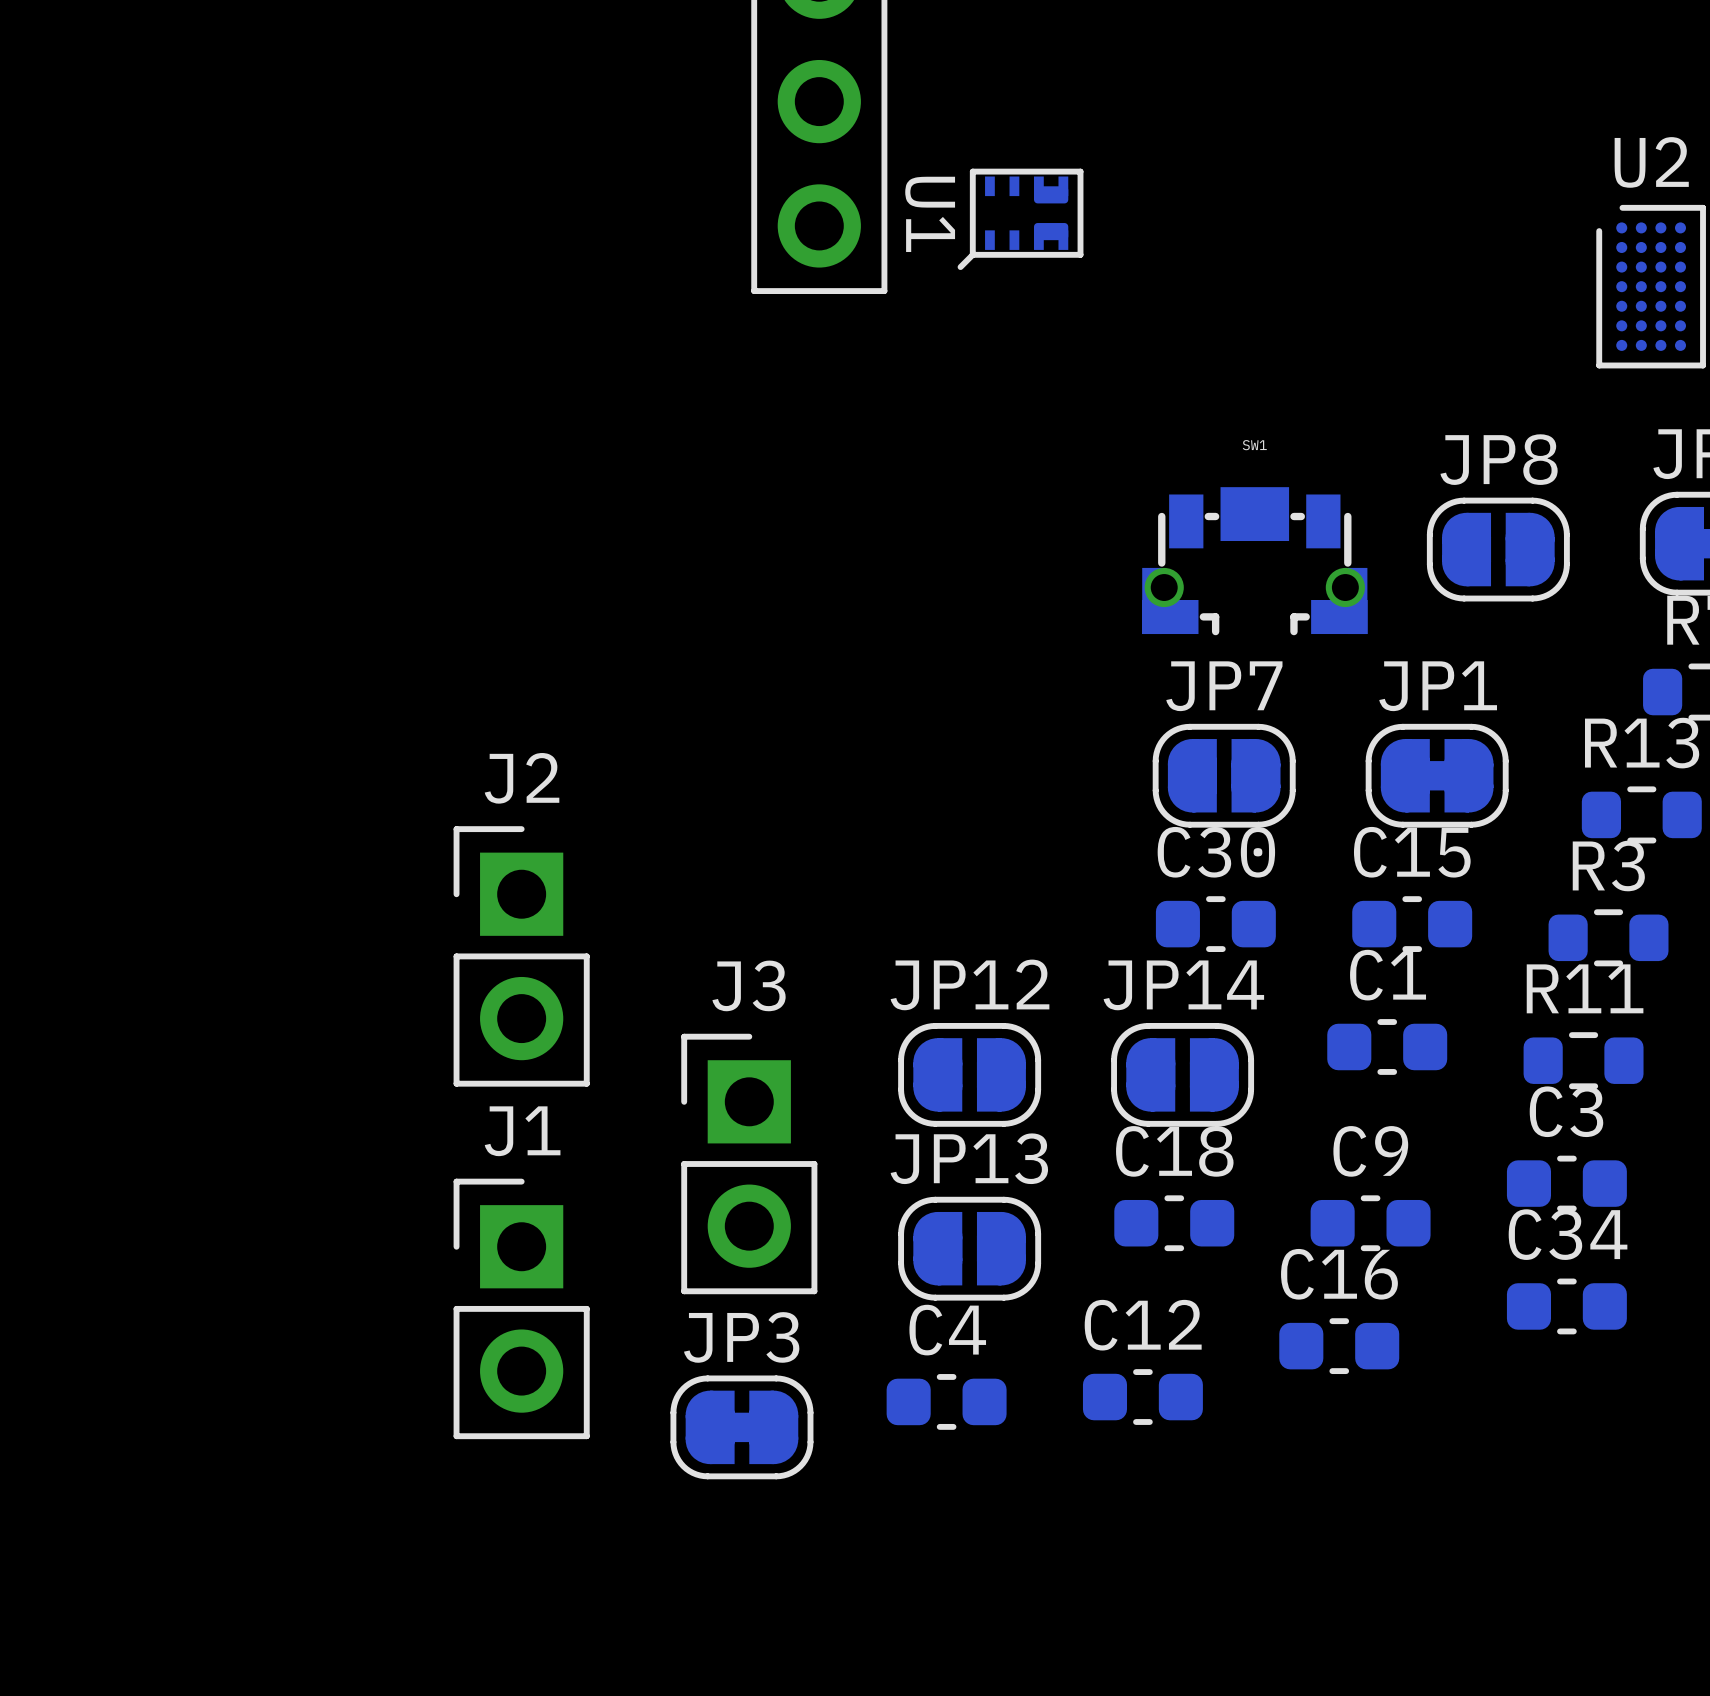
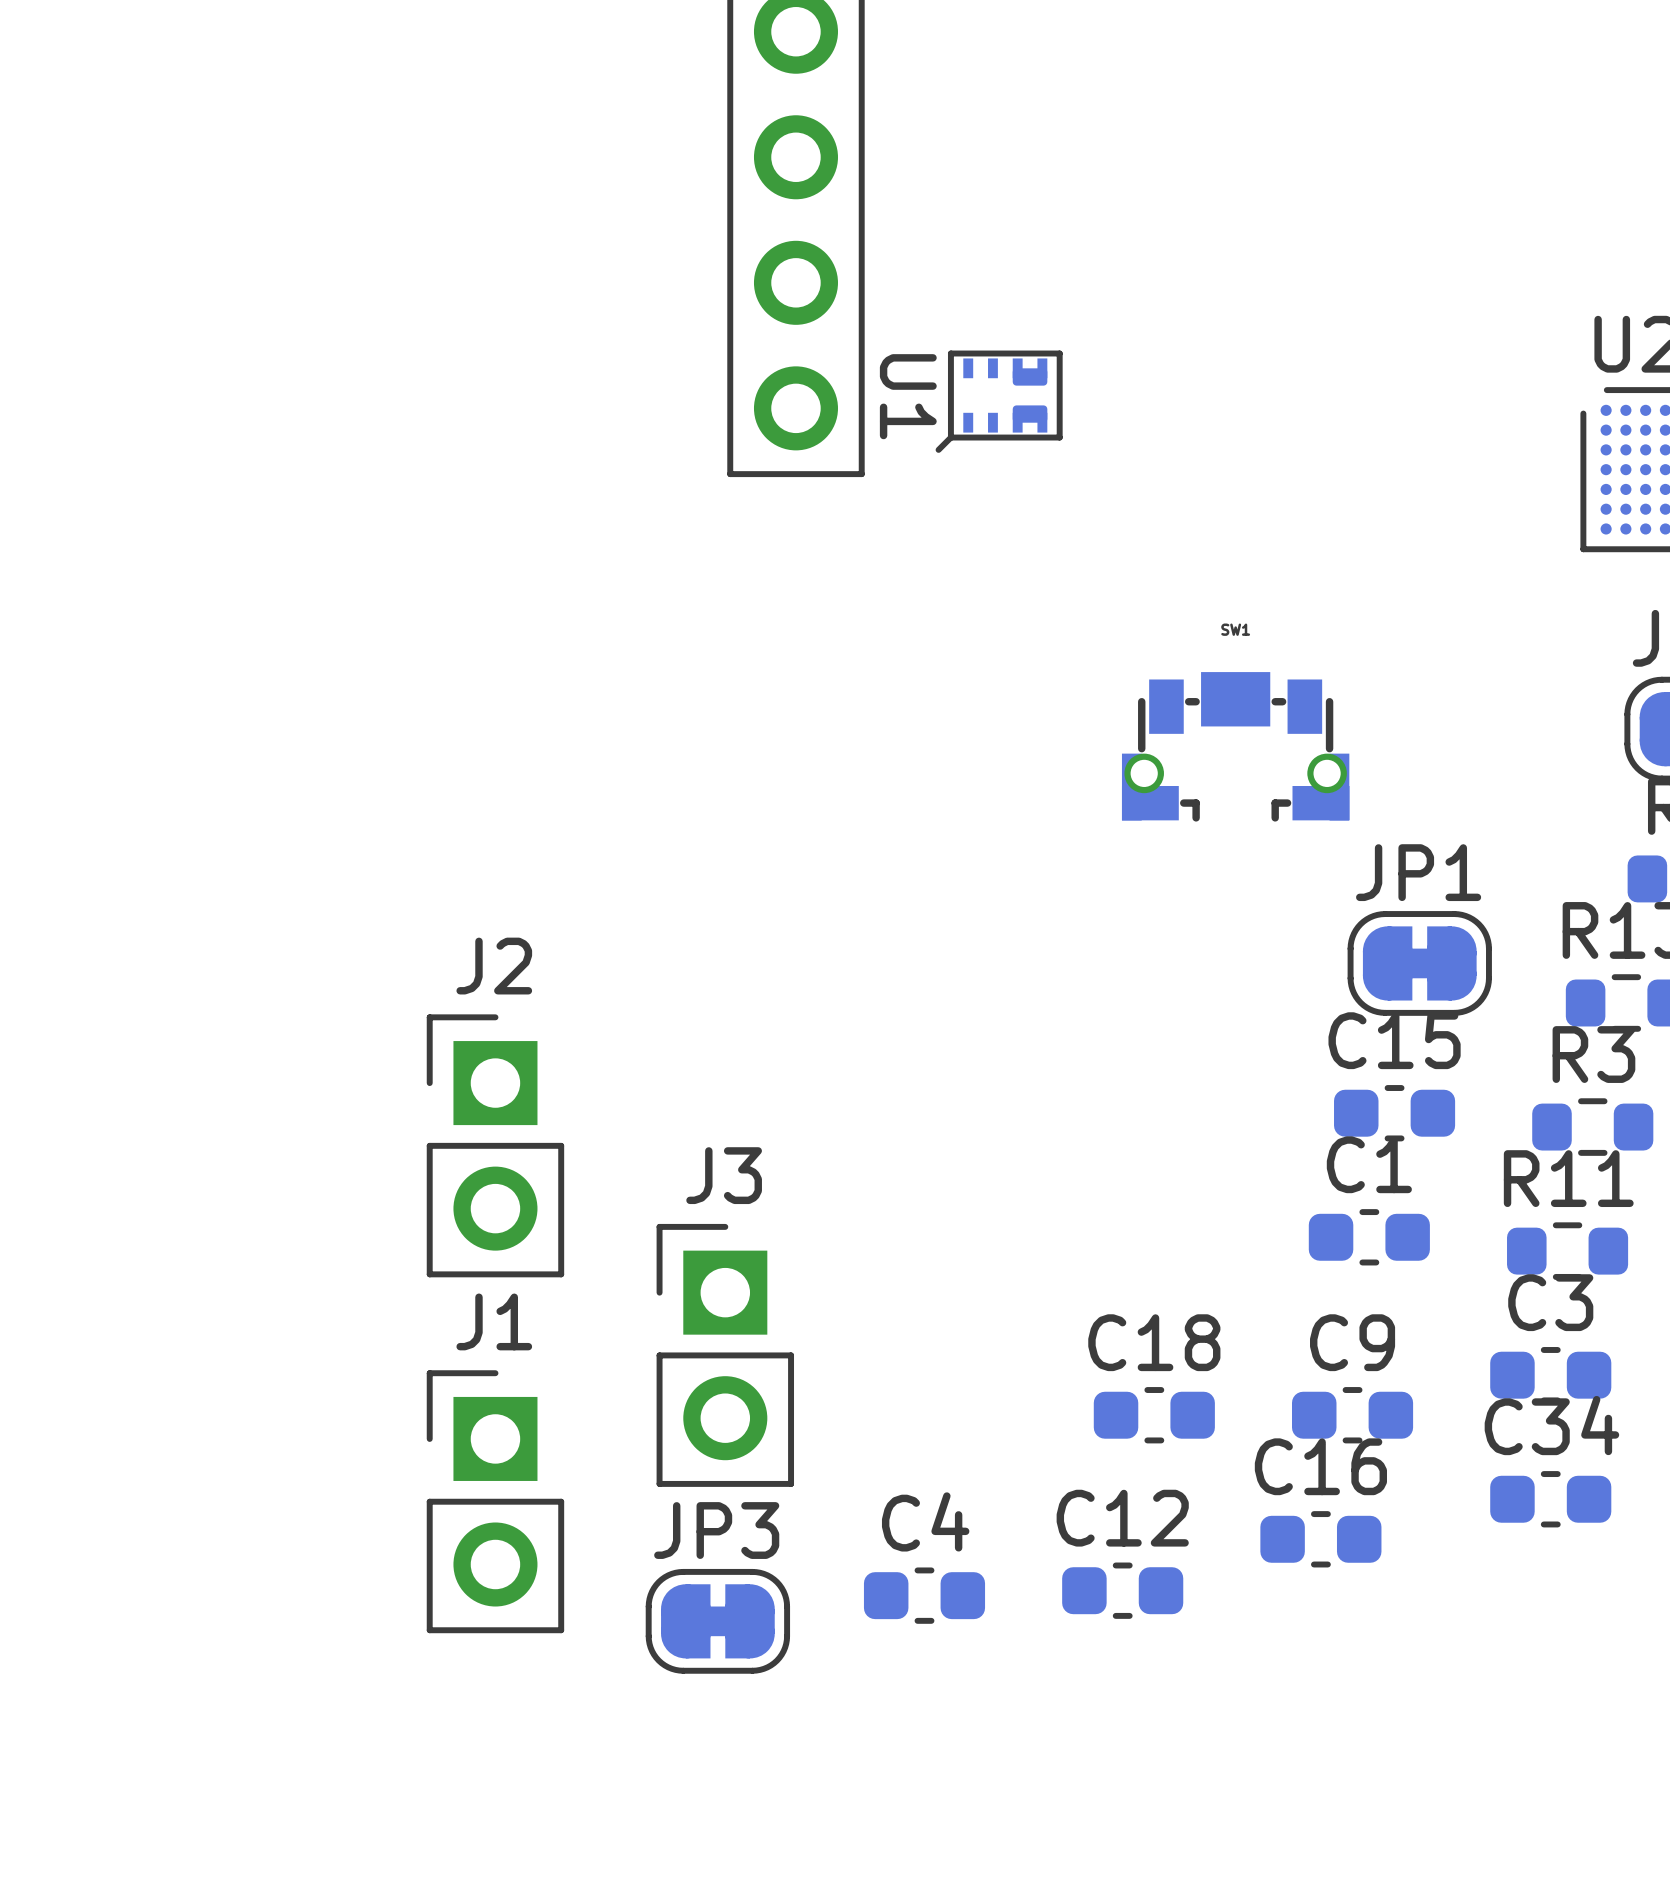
JP8: (1498, 549) -> none
JP7: (1224, 775) -> none
C30: (1215, 924) -> none
JP12: (969, 1074) -> none
JP14: (1182, 1074) -> none
JP13: (969, 1248) -> none

